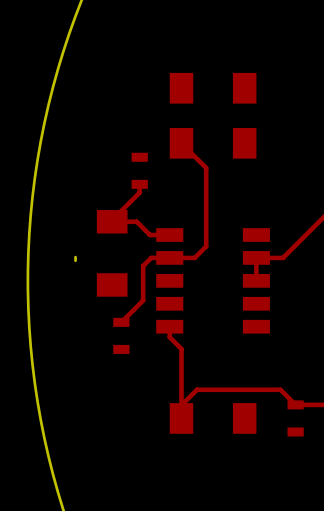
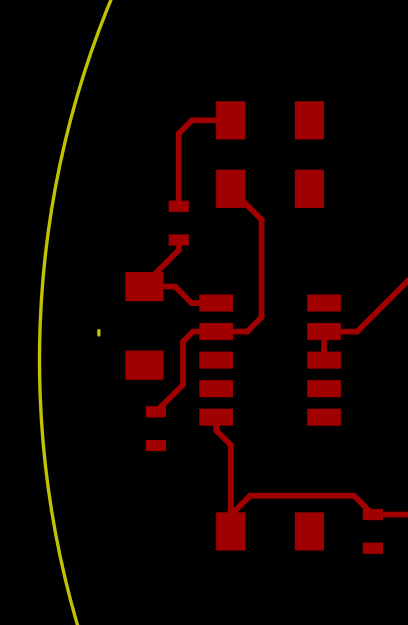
top track: none -> (230, 120) (191, 120) (178, 133) (178, 206)

